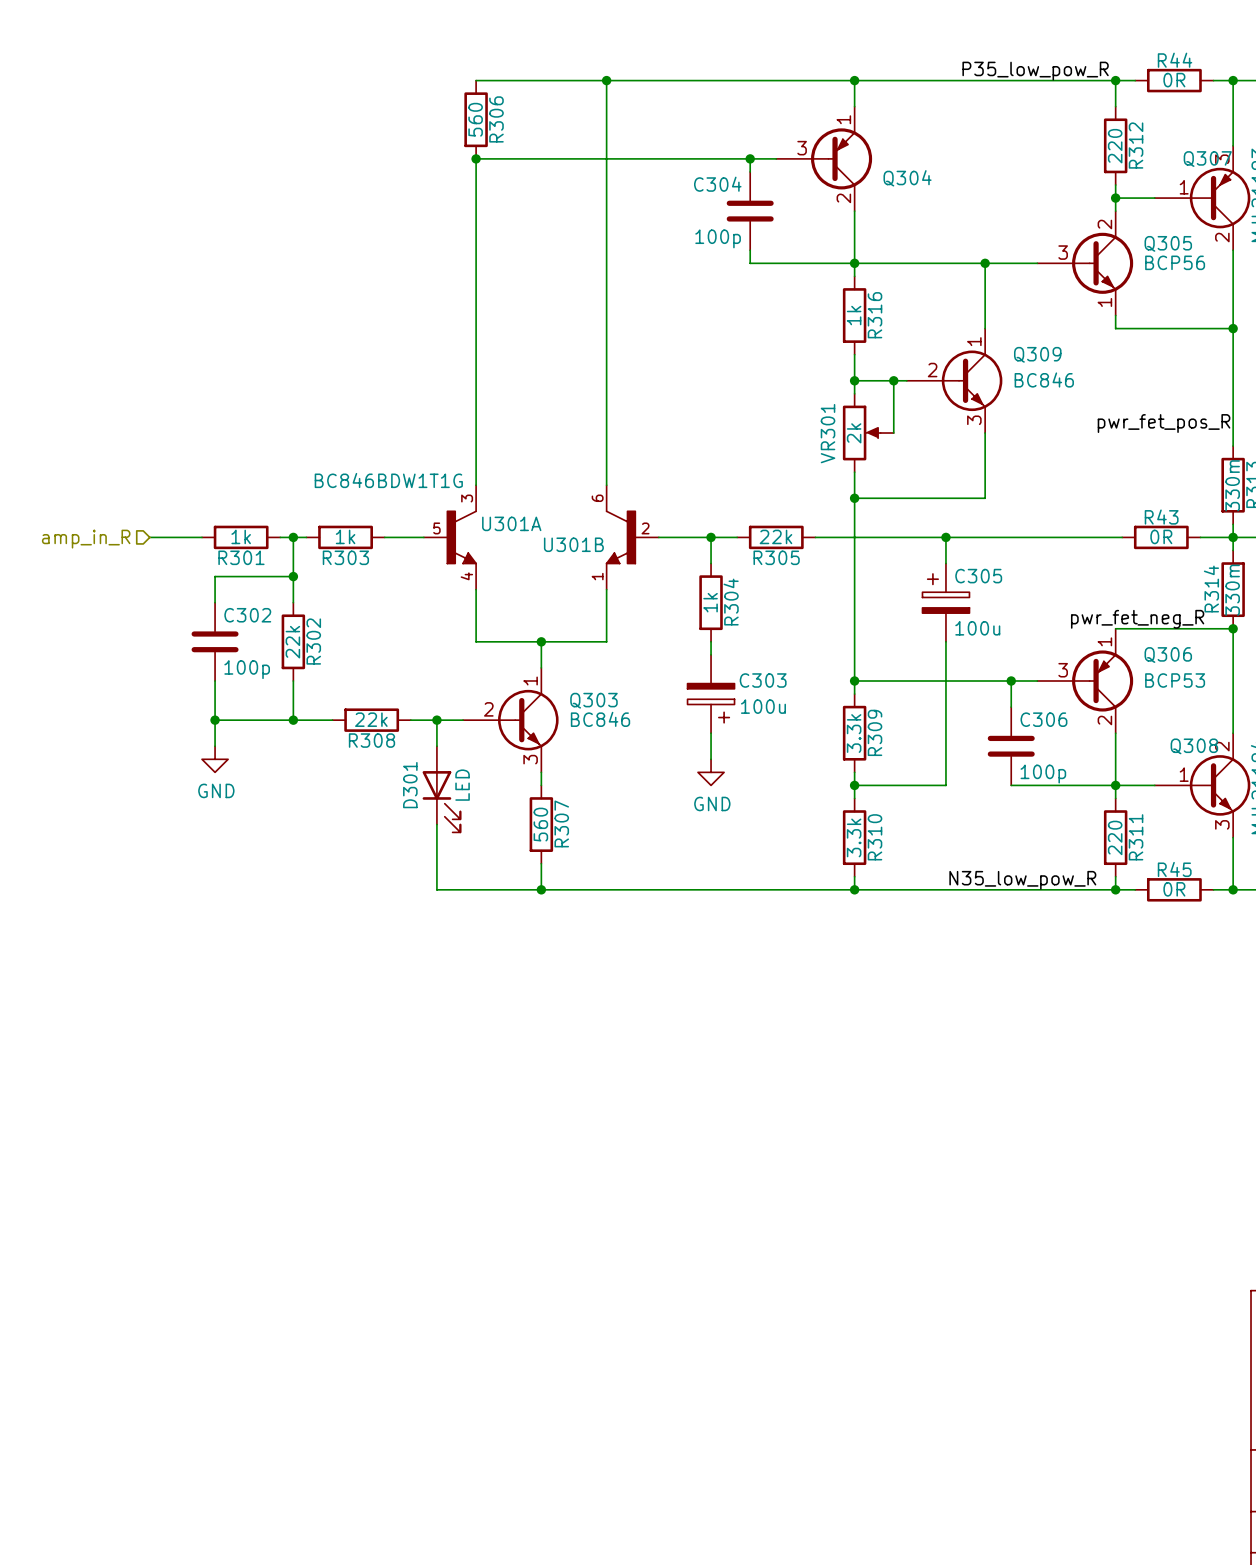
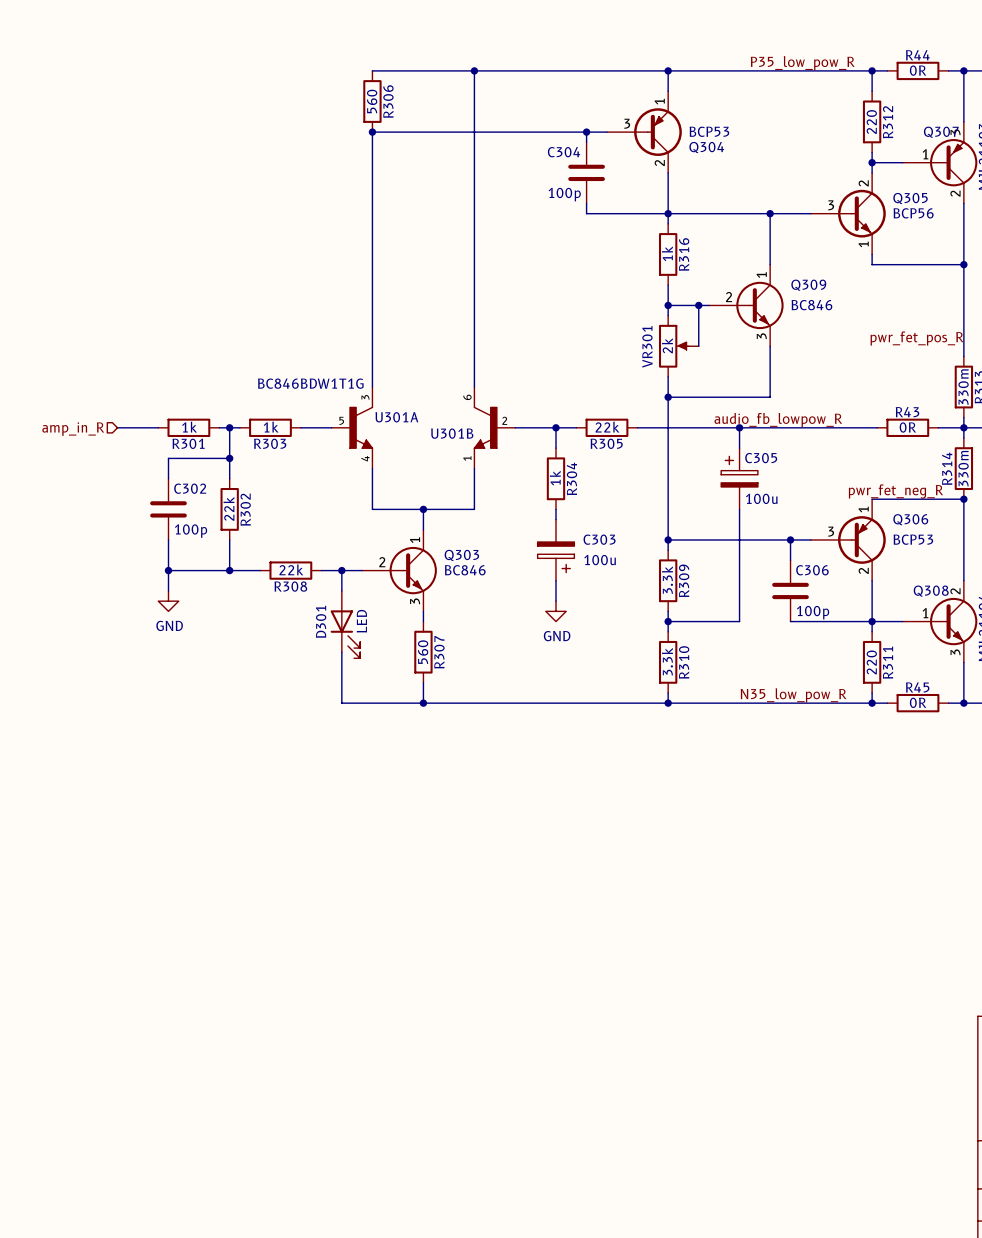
Q304 value: none -> BCP53 (709, 131)
label: none -> audio_fb_lowpow_R (778, 420)

